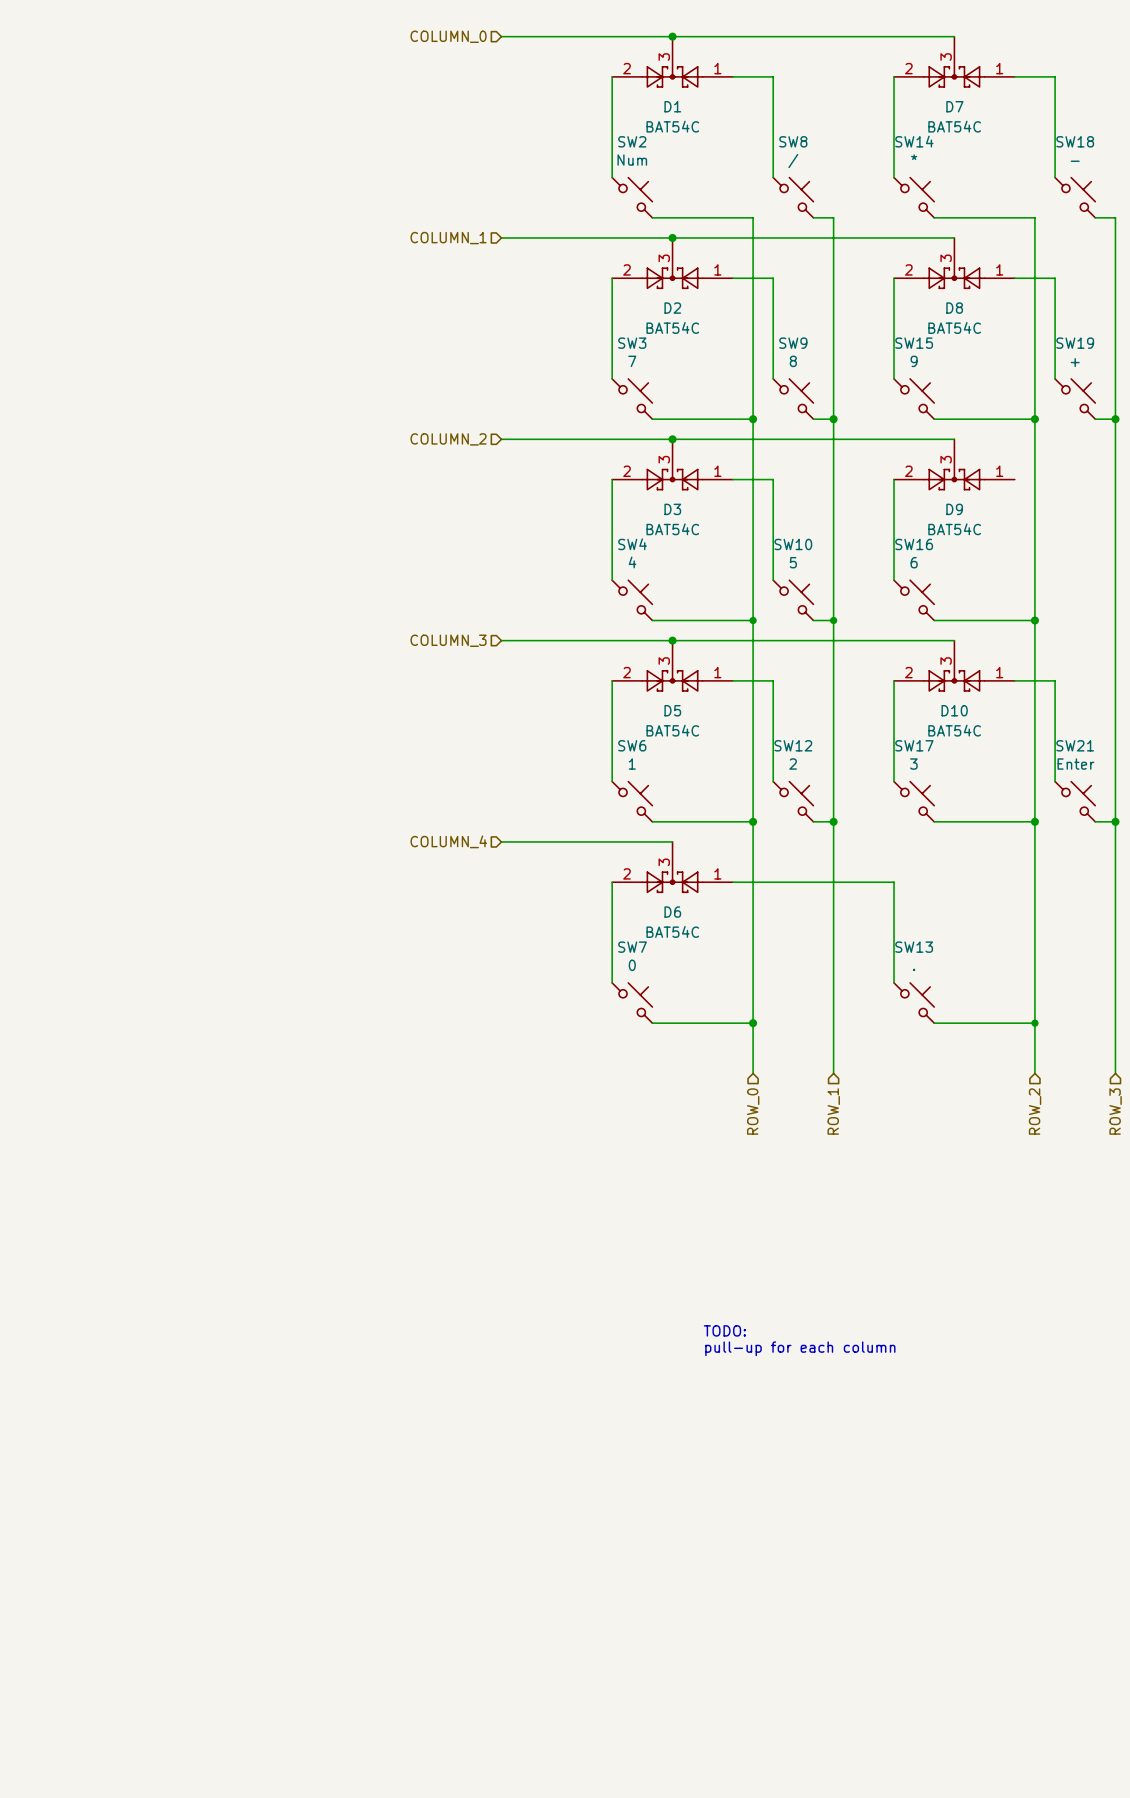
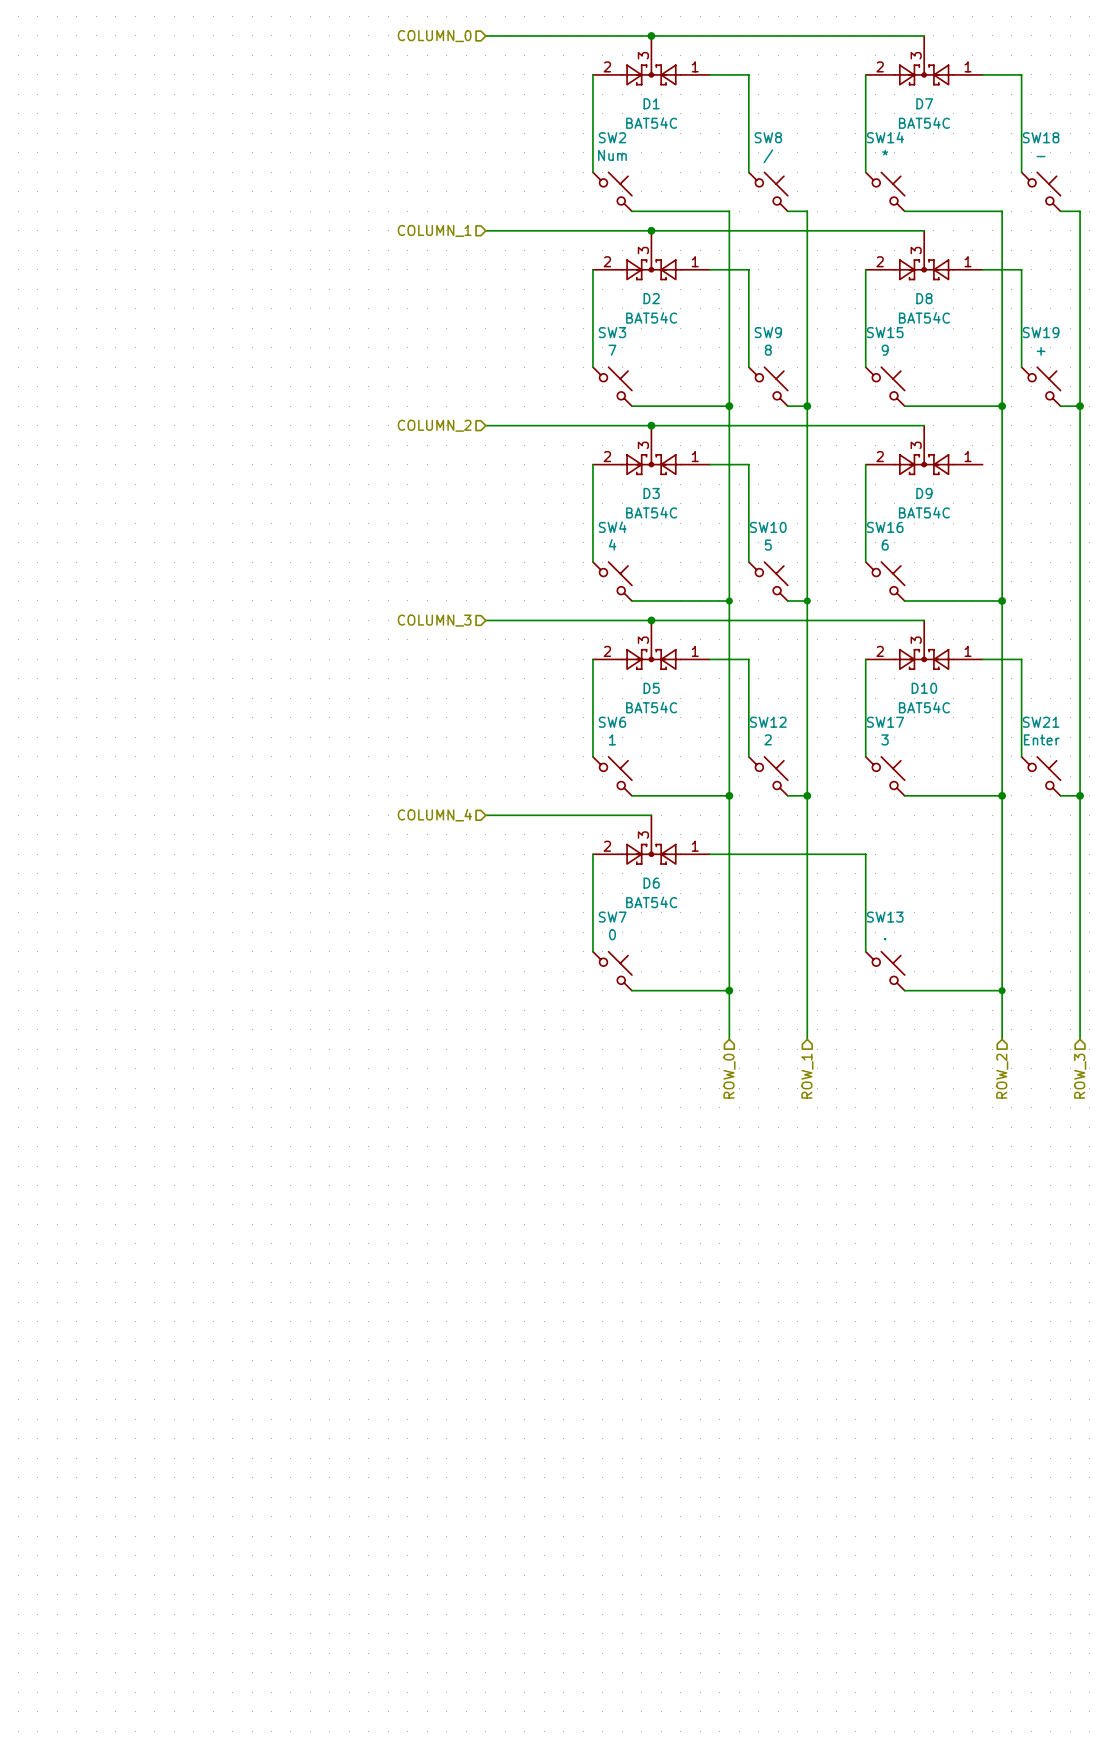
text: TODO: (724, 1330) -> none
text: pull-up for each column (800, 1348) -> none

